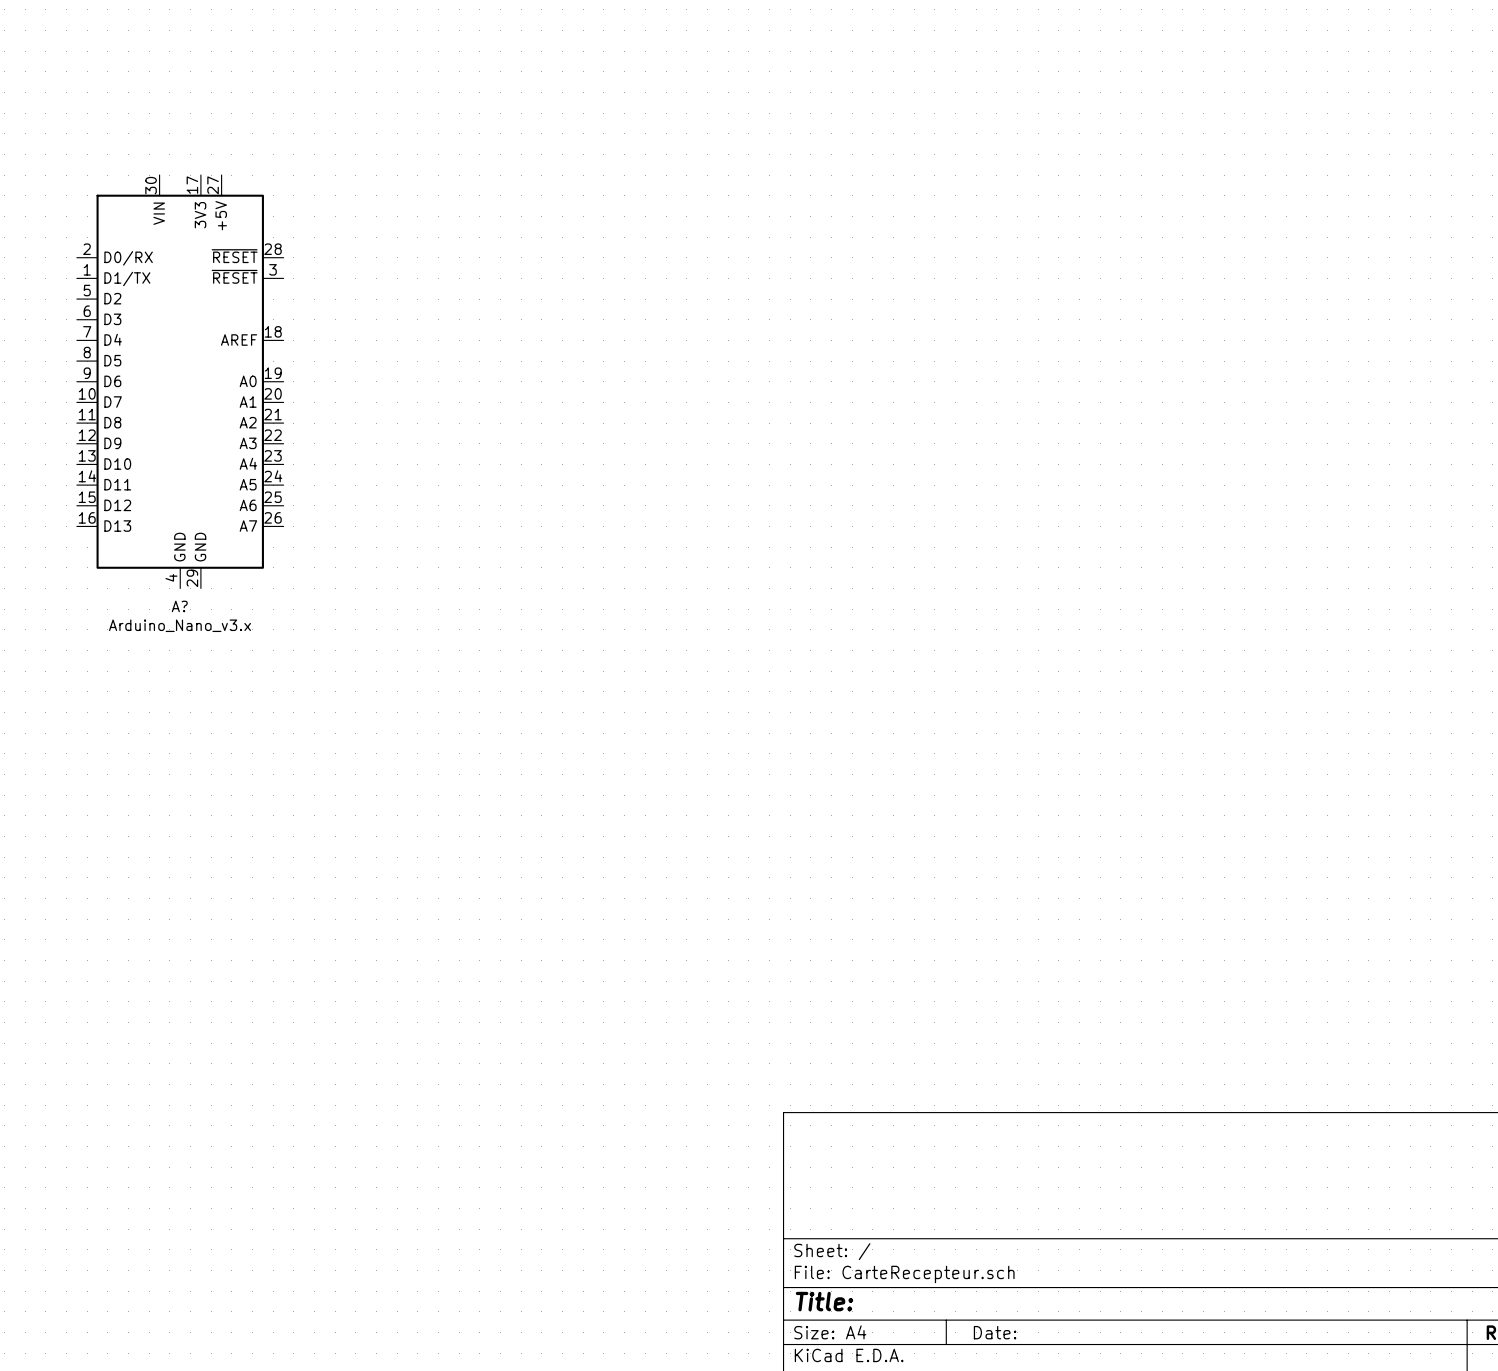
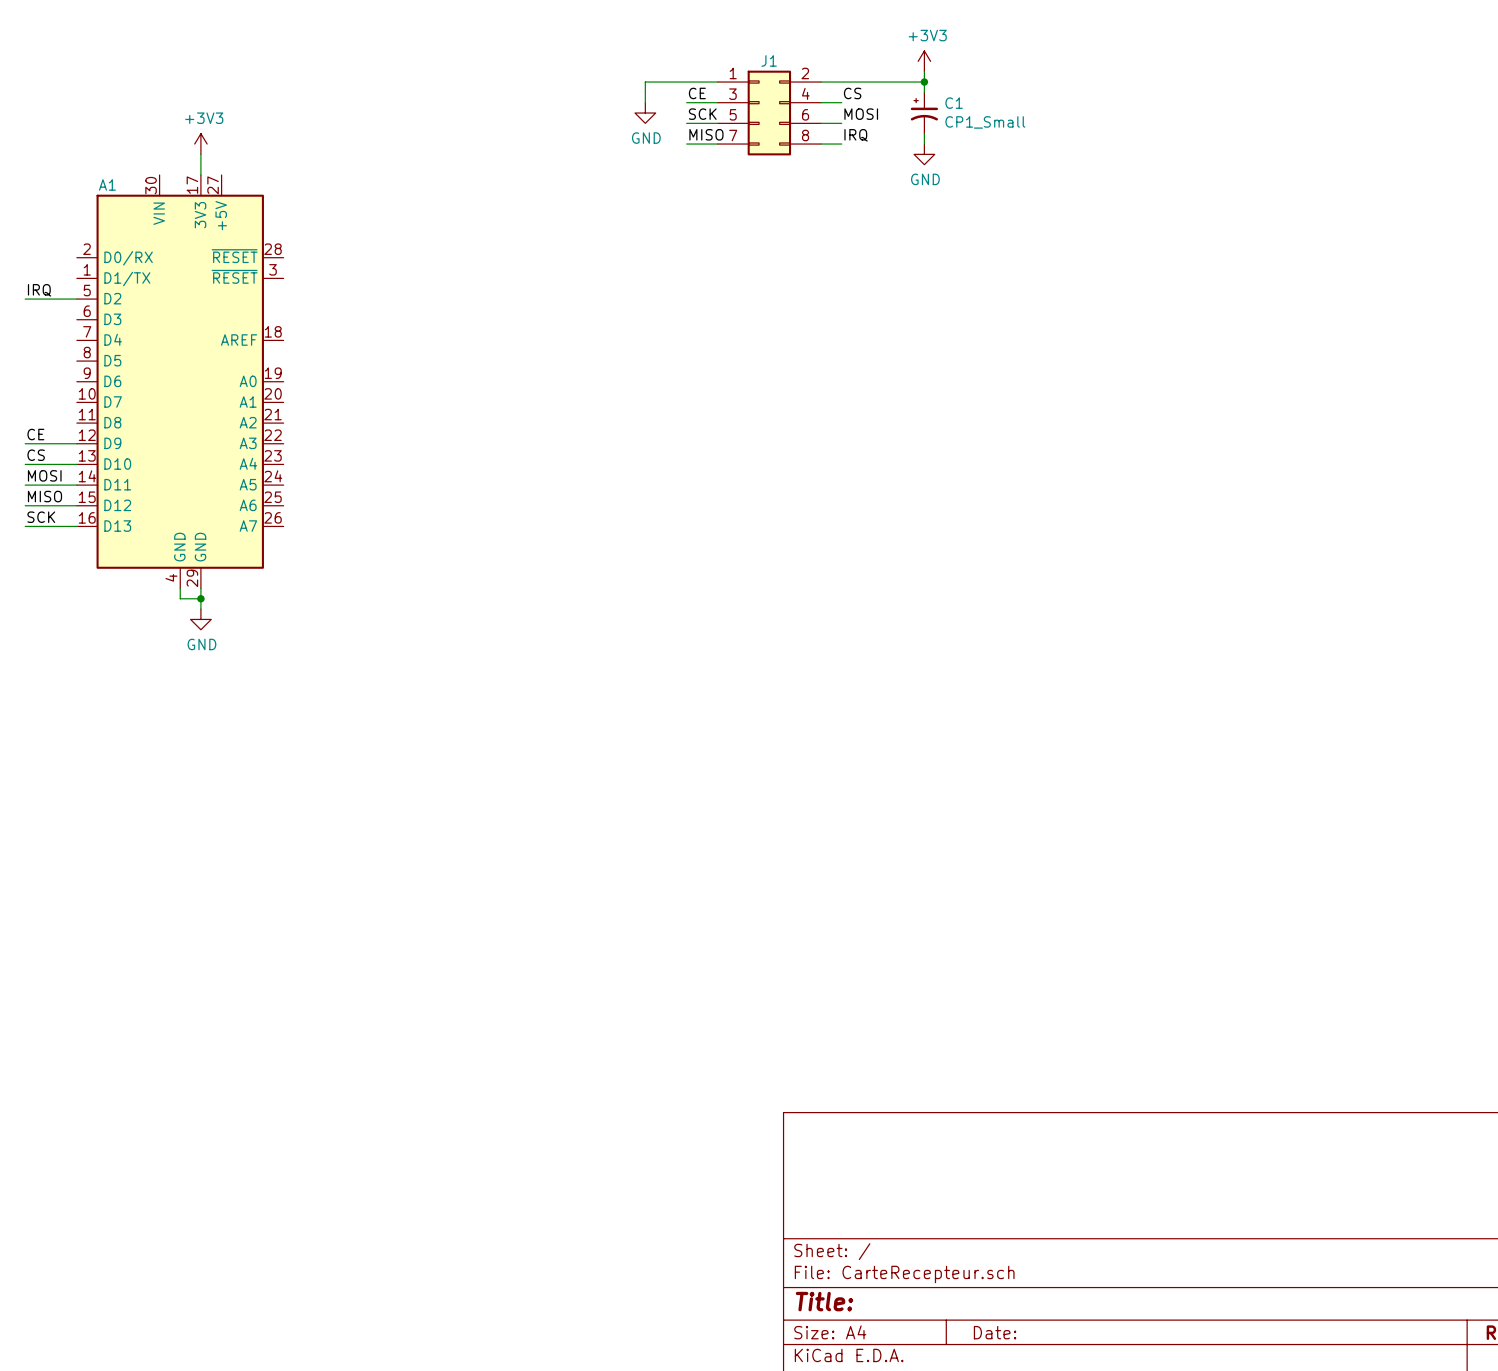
power symbol: none -> +3V3 (924, 61)
wire: none -> (924, 71) (924, 92)
wire: none -> (717, 82) (645, 82) (645, 102)
wire: none -> (821, 82) (924, 82)
junction: none -> (924, 82)
label: none -> CE (697, 93)
label: none -> CS (852, 93)
wire: none -> (686, 102) (717, 102)
wire: none -> (821, 102) (841, 102)
power symbol: none -> GND (645, 113)
J1: none -> (769, 113)
C1: none -> CP1_Small (924, 113)
label: none -> SCK (702, 114)
label: none -> MOSI (861, 114)
wire: none -> (686, 123) (717, 123)
wire: none -> (821, 123) (841, 123)
wire: none -> (924, 133) (924, 144)
label: none -> MISO (706, 134)
label: none -> IRQ (856, 135)
power symbol: none -> +3V3 (200, 144)
wire: none -> (686, 144) (717, 144)
wire: none -> (821, 144) (841, 144)
wire: none -> (200, 154) (200, 175)
power symbol: none -> GND (924, 154)
label: none -> IRQ (39, 290)
wire: none -> (25, 299) (76, 299)
label: none -> CE (35, 434)
wire: none -> (25, 443) (76, 443)
label: none -> CS (36, 455)
wire: none -> (25, 464) (76, 464)
label: none -> MOSI (44, 475)
wire: none -> (25, 485) (76, 485)
label: none -> MISO (44, 496)
wire: none -> (25, 505) (76, 505)
label: none -> SCK (41, 517)
wire: none -> (25, 526) (76, 526)
wire: none -> (180, 588) (180, 598) (200, 598)
wire: none -> (200, 588) (200, 609)
junction: none -> (200, 598)
A? name: A? (179, 606) -> A1 (107, 184)
power symbol: none -> GND (200, 619)
A? value: Arduino_Nano_v3.x (180, 625) -> none

